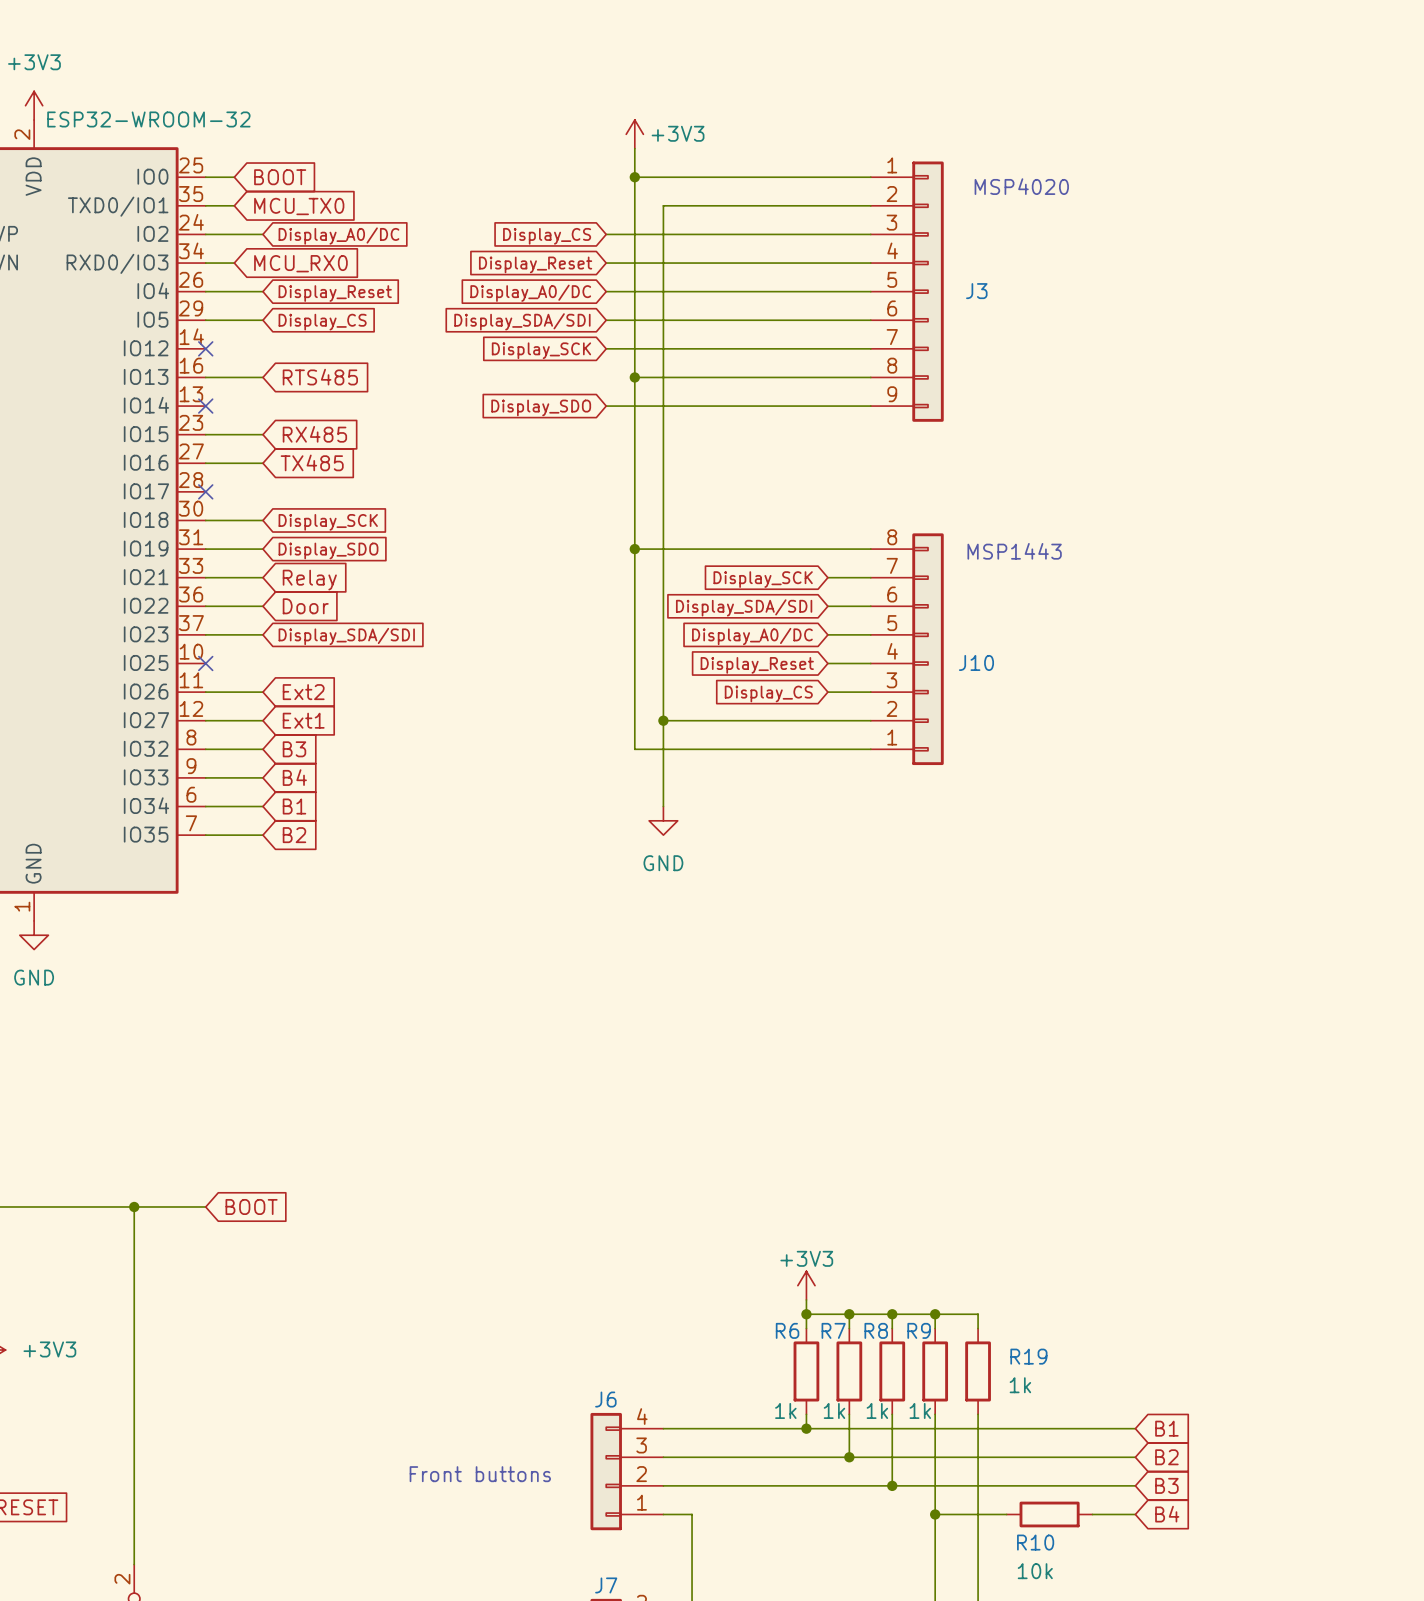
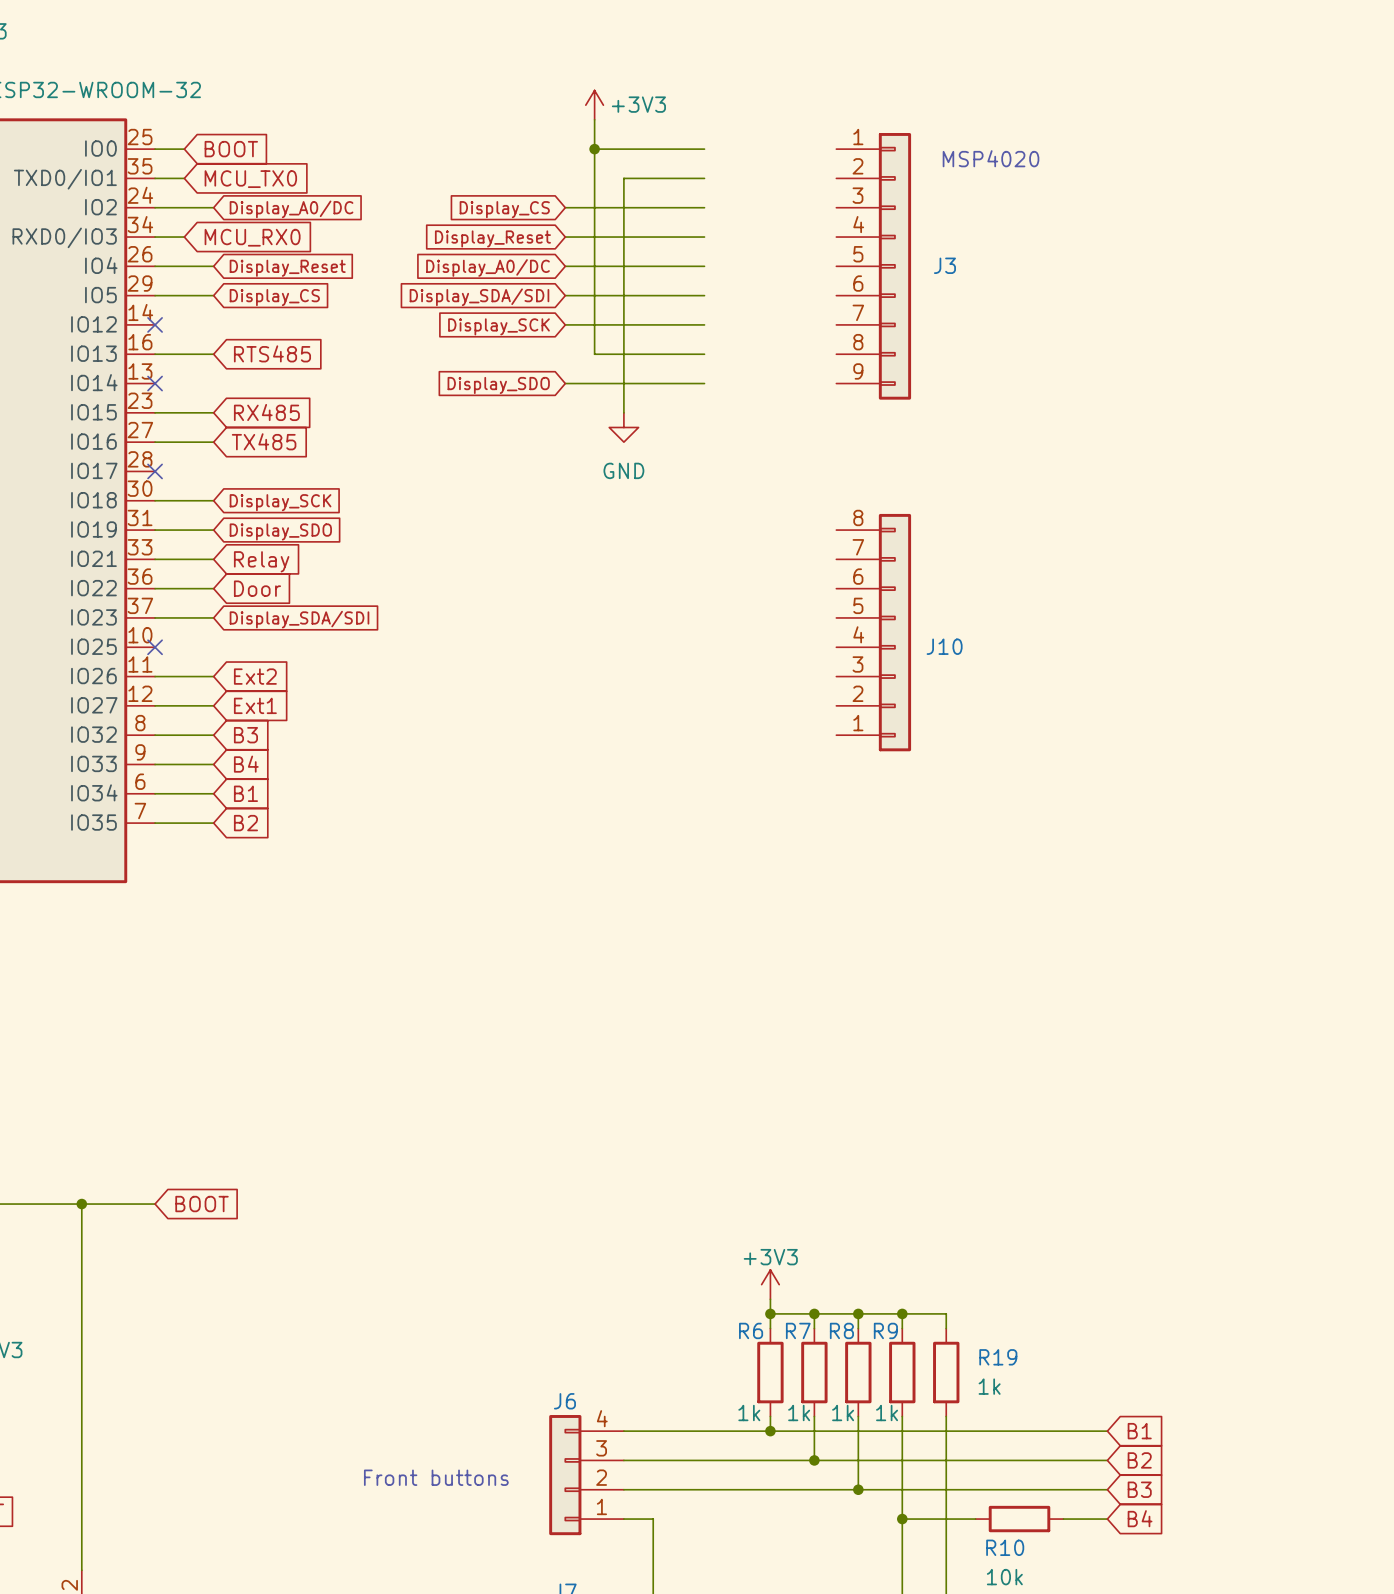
wire: (742, 177) (870, 177) -> none
wire: (742, 205) (870, 205) -> none
wire: (742, 234) (870, 234) -> none
wire: (742, 263) (870, 263) -> none
wire: (742, 291) (870, 291) -> none
wire: (742, 320) (870, 320) -> none
wire: (742, 348) (870, 348) -> none
wire: (634, 377) (634, 749) (870, 749) -> none
junction: (634, 377) -> none
wire: (742, 377) (870, 377) -> none
wire: (742, 406) (870, 406) -> none
wire: (663, 434) (663, 806) -> none
power symbol: none -> GND (623, 427)
wire: (634, 549) (870, 549) -> none
junction: (634, 549) -> none
text: MSP1443 (1014, 551) -> none
wire: (827, 577) (870, 577) -> none
global label: Display_SCK (763, 579) -> none
wire: (827, 606) (870, 606) -> none
global label: Display_SDA/SDI (744, 607) -> none
wire: (827, 634) (870, 634) -> none
global label: Display_A0/DC (752, 636) -> none
wire: (827, 663) (870, 663) -> none
global label: Display_Reset (757, 665) -> none
wire: (827, 692) (870, 692) -> none
global label: Display_CS (768, 693) -> none
wire: (663, 720) (870, 720) -> none
junction: (663, 720) -> none
power symbol: GND (663, 820) -> none

